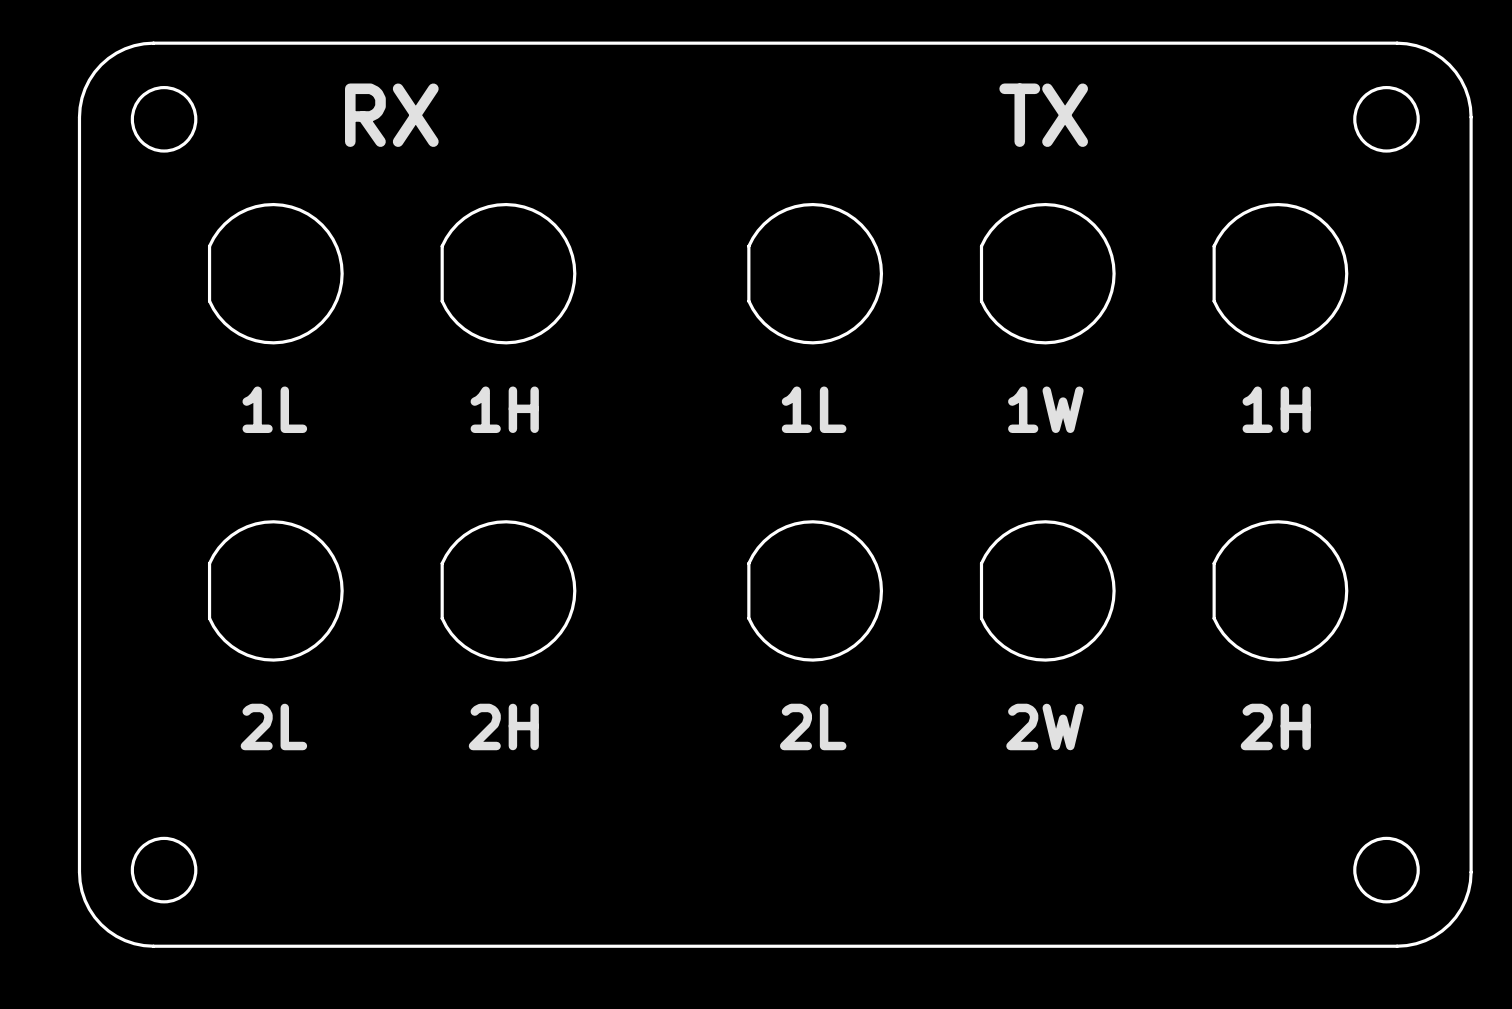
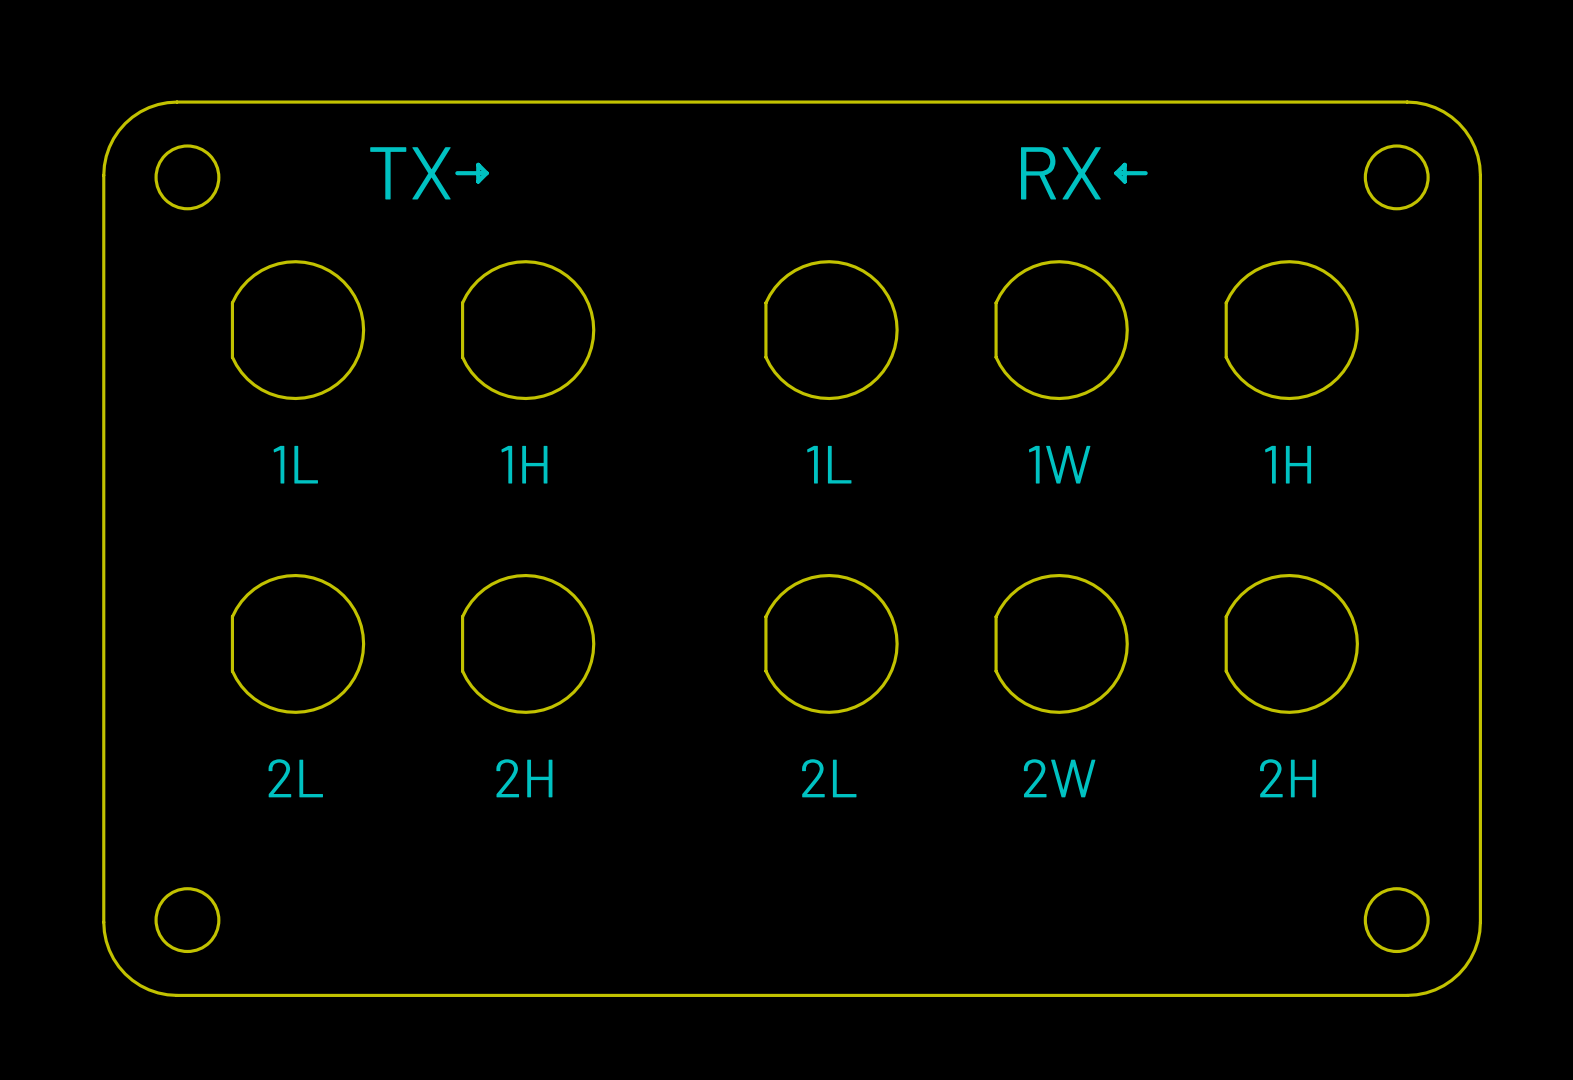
text: RX (391, 115) -> TX (410, 173)
line: none -> (457, 173) (486, 173)
line: none -> (486, 173) (478, 181) (478, 164) (486, 173)
text: TX (1043, 115) -> RX (1060, 173)
line: none -> (1116, 173) (1145, 173)
line: none -> (1116, 173) (1124, 181) (1124, 164) (1116, 173)

